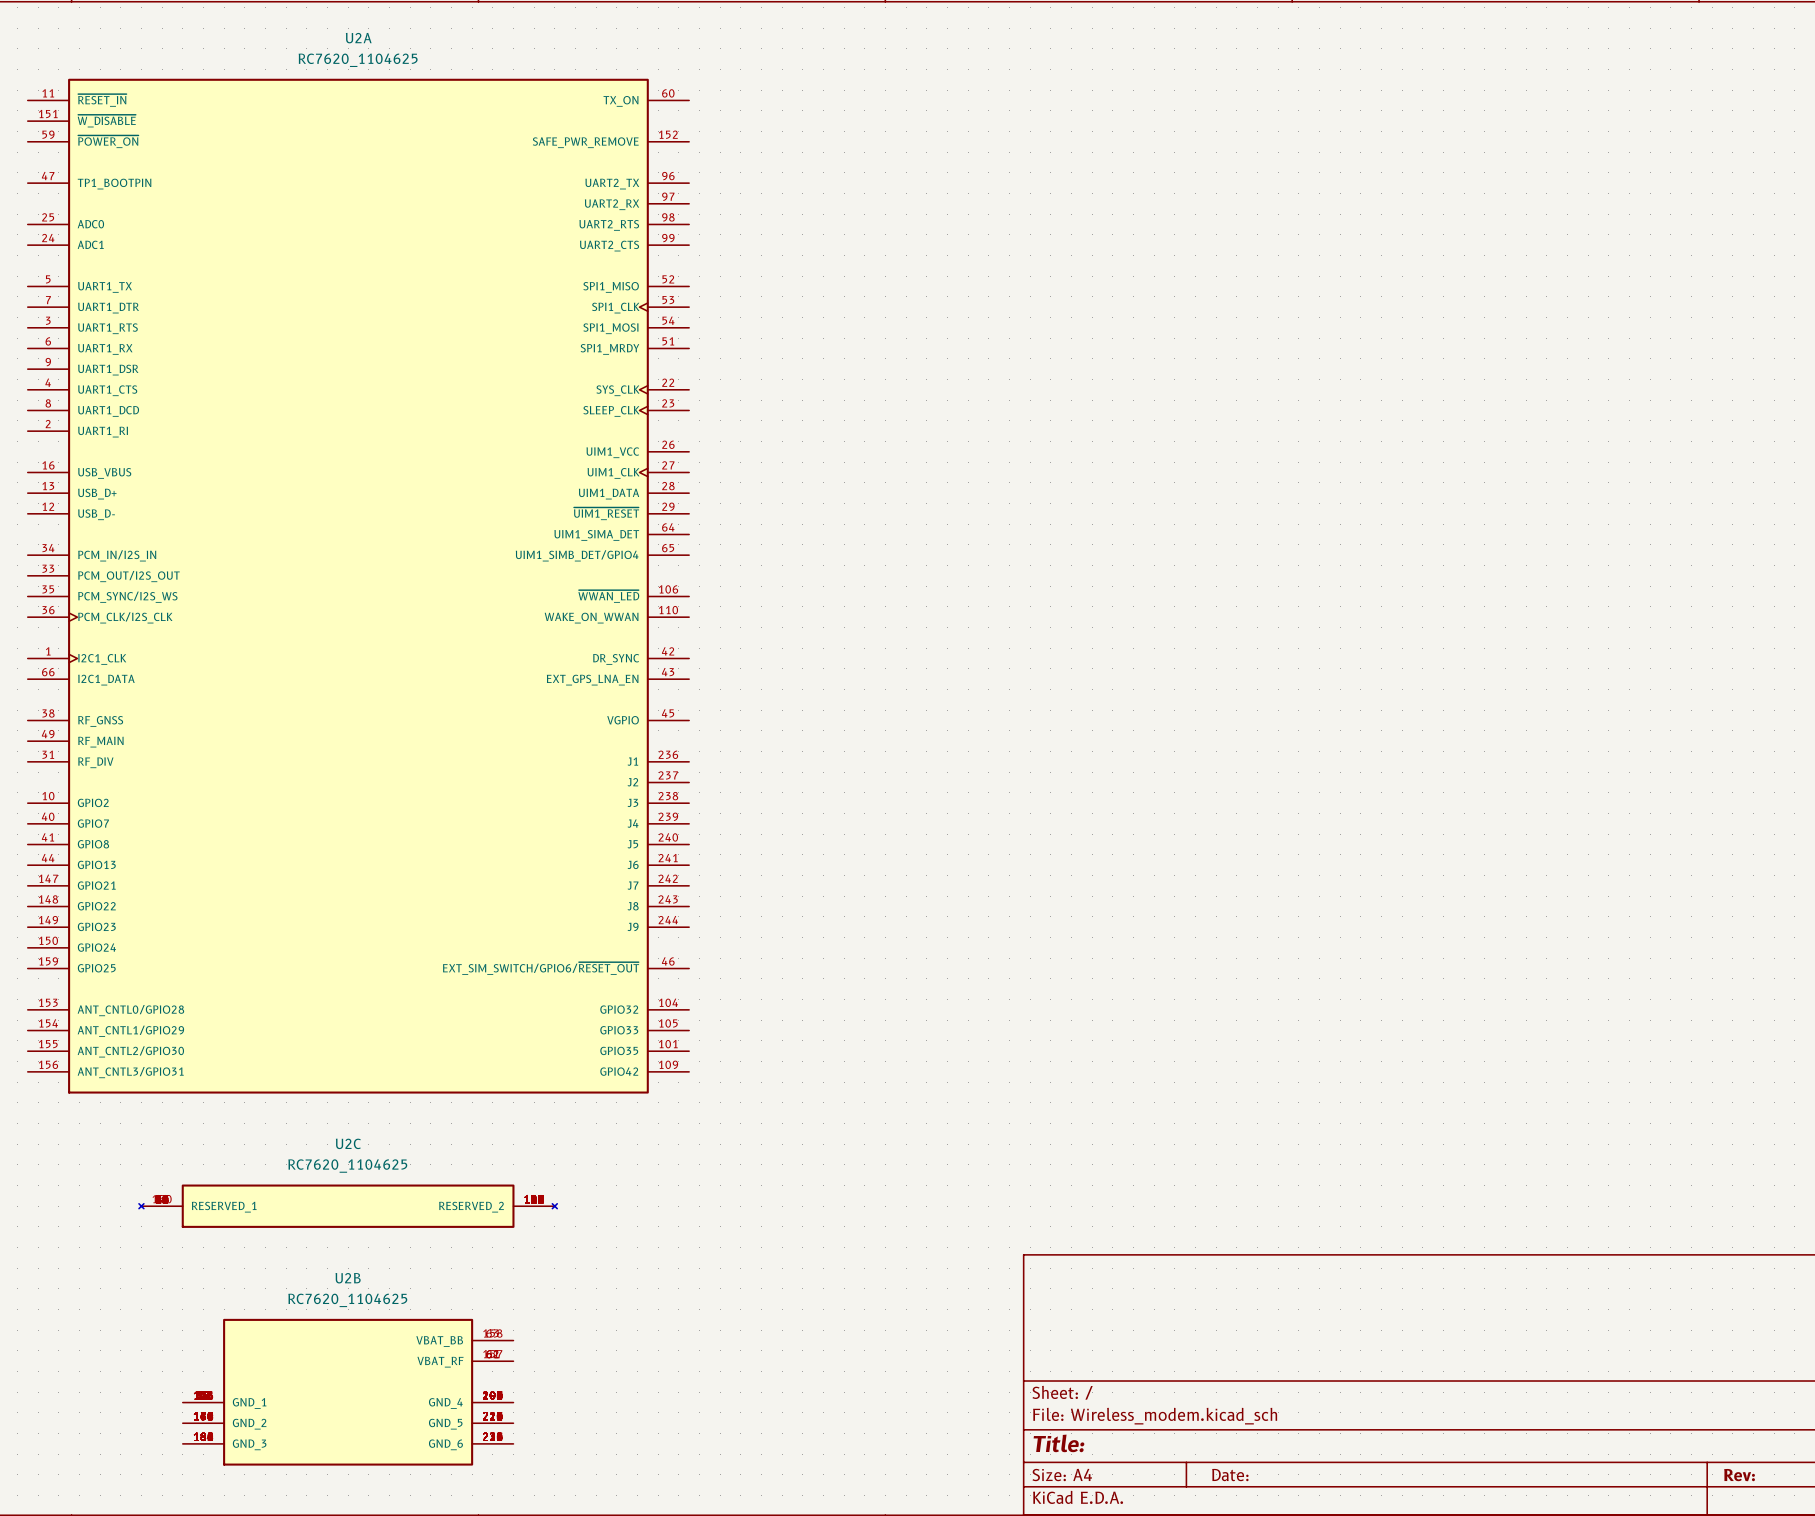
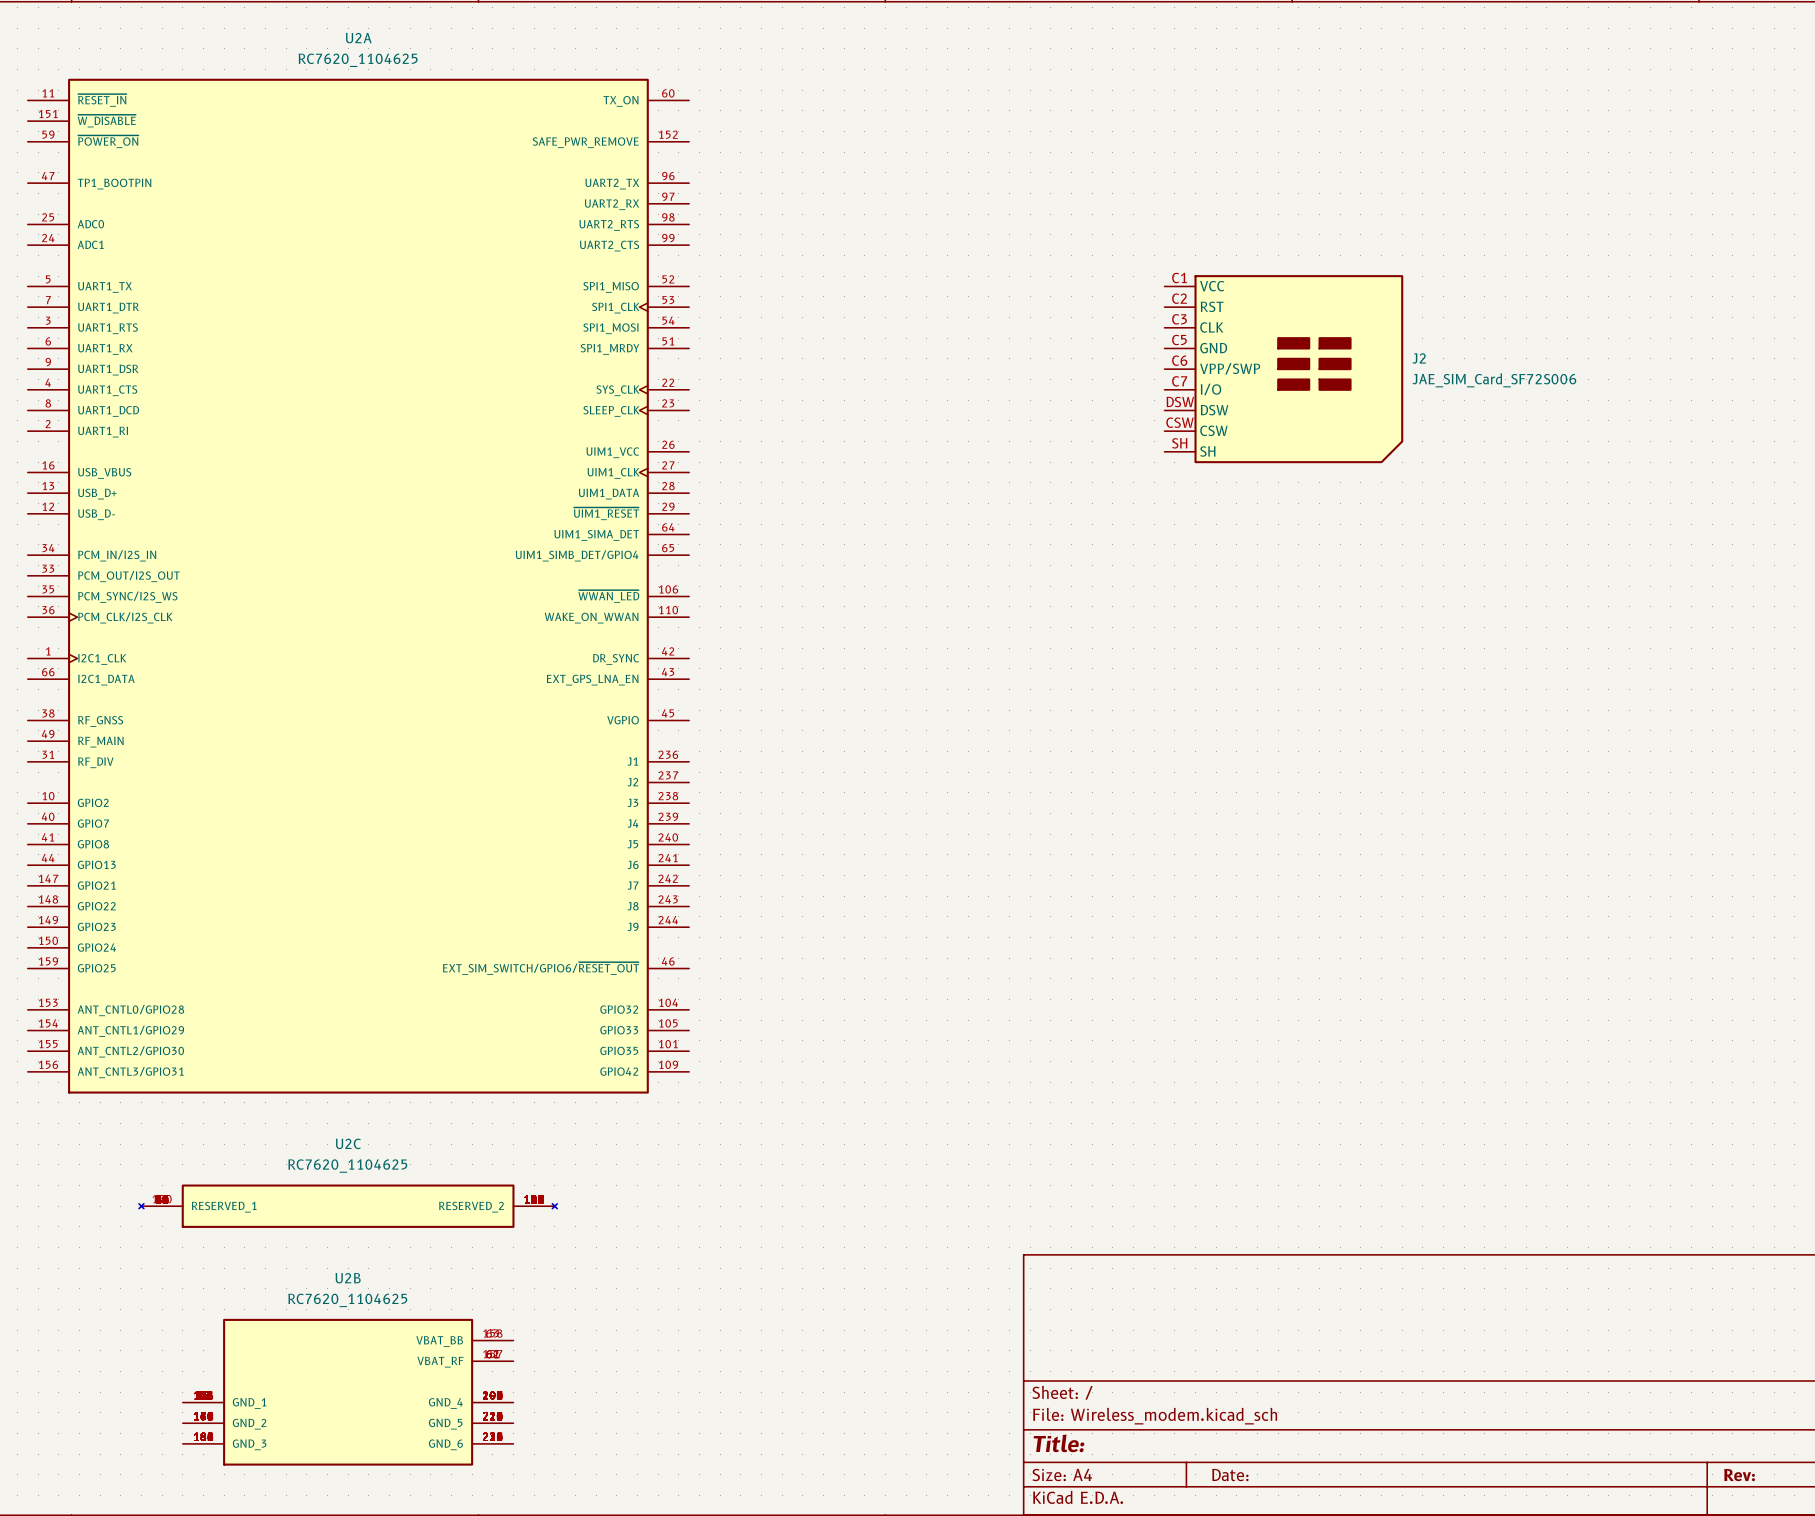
J2: none -> JAE_SIM_Card_SF72S006 (1283, 369)

